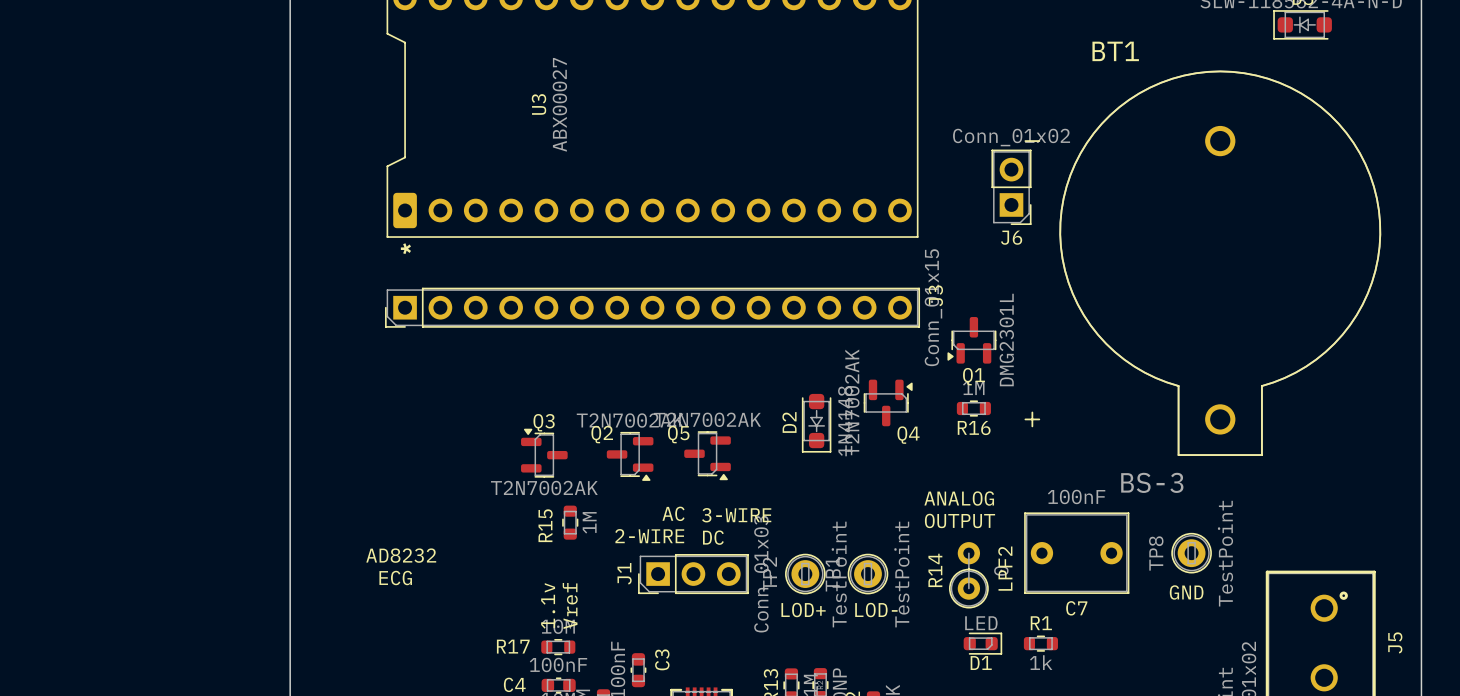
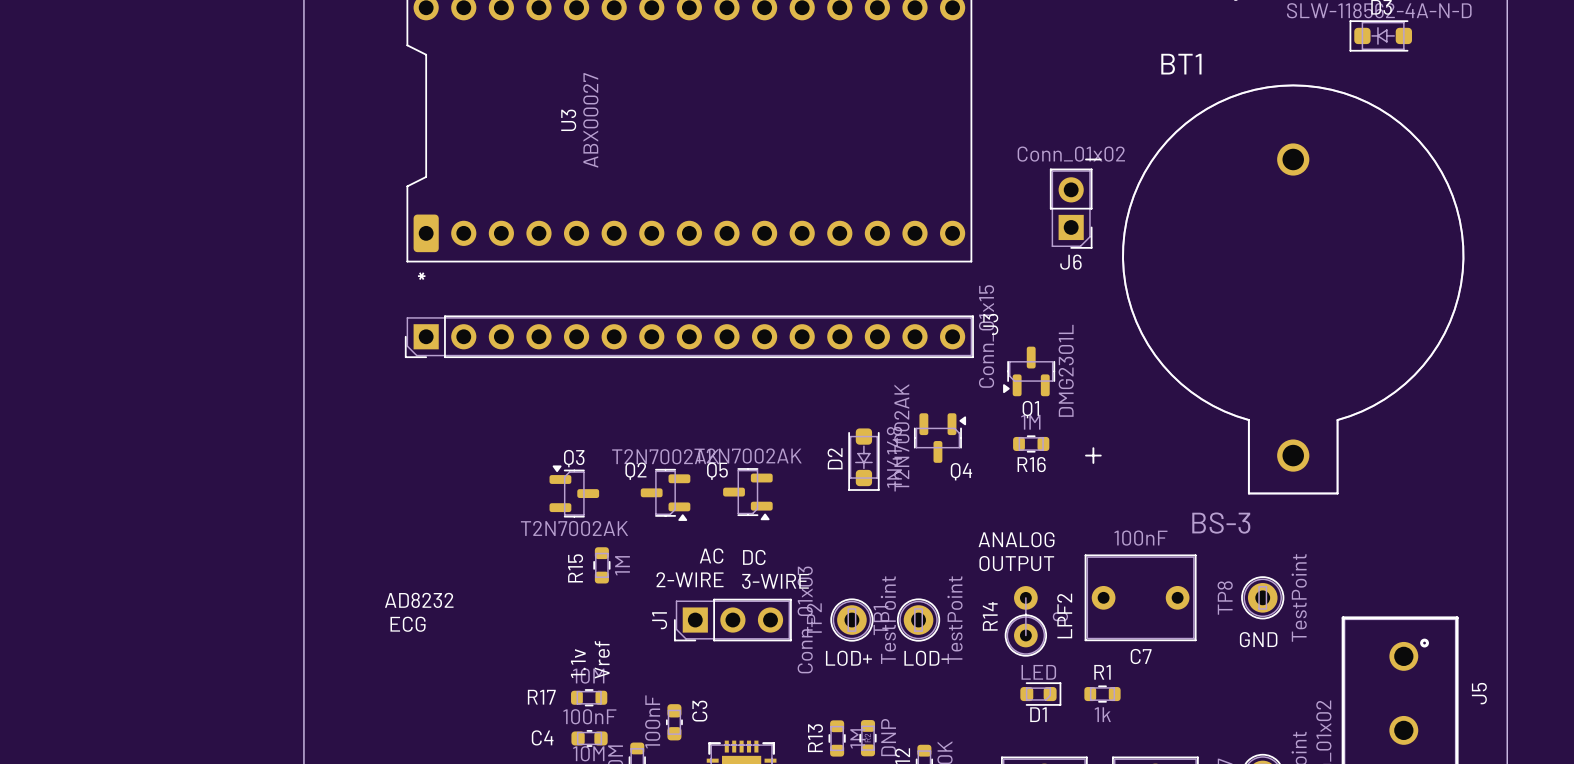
text: 3-WIRE (736, 515) -> DC (754, 557)
text: DC (713, 537) -> 3-WIRE (775, 581)

